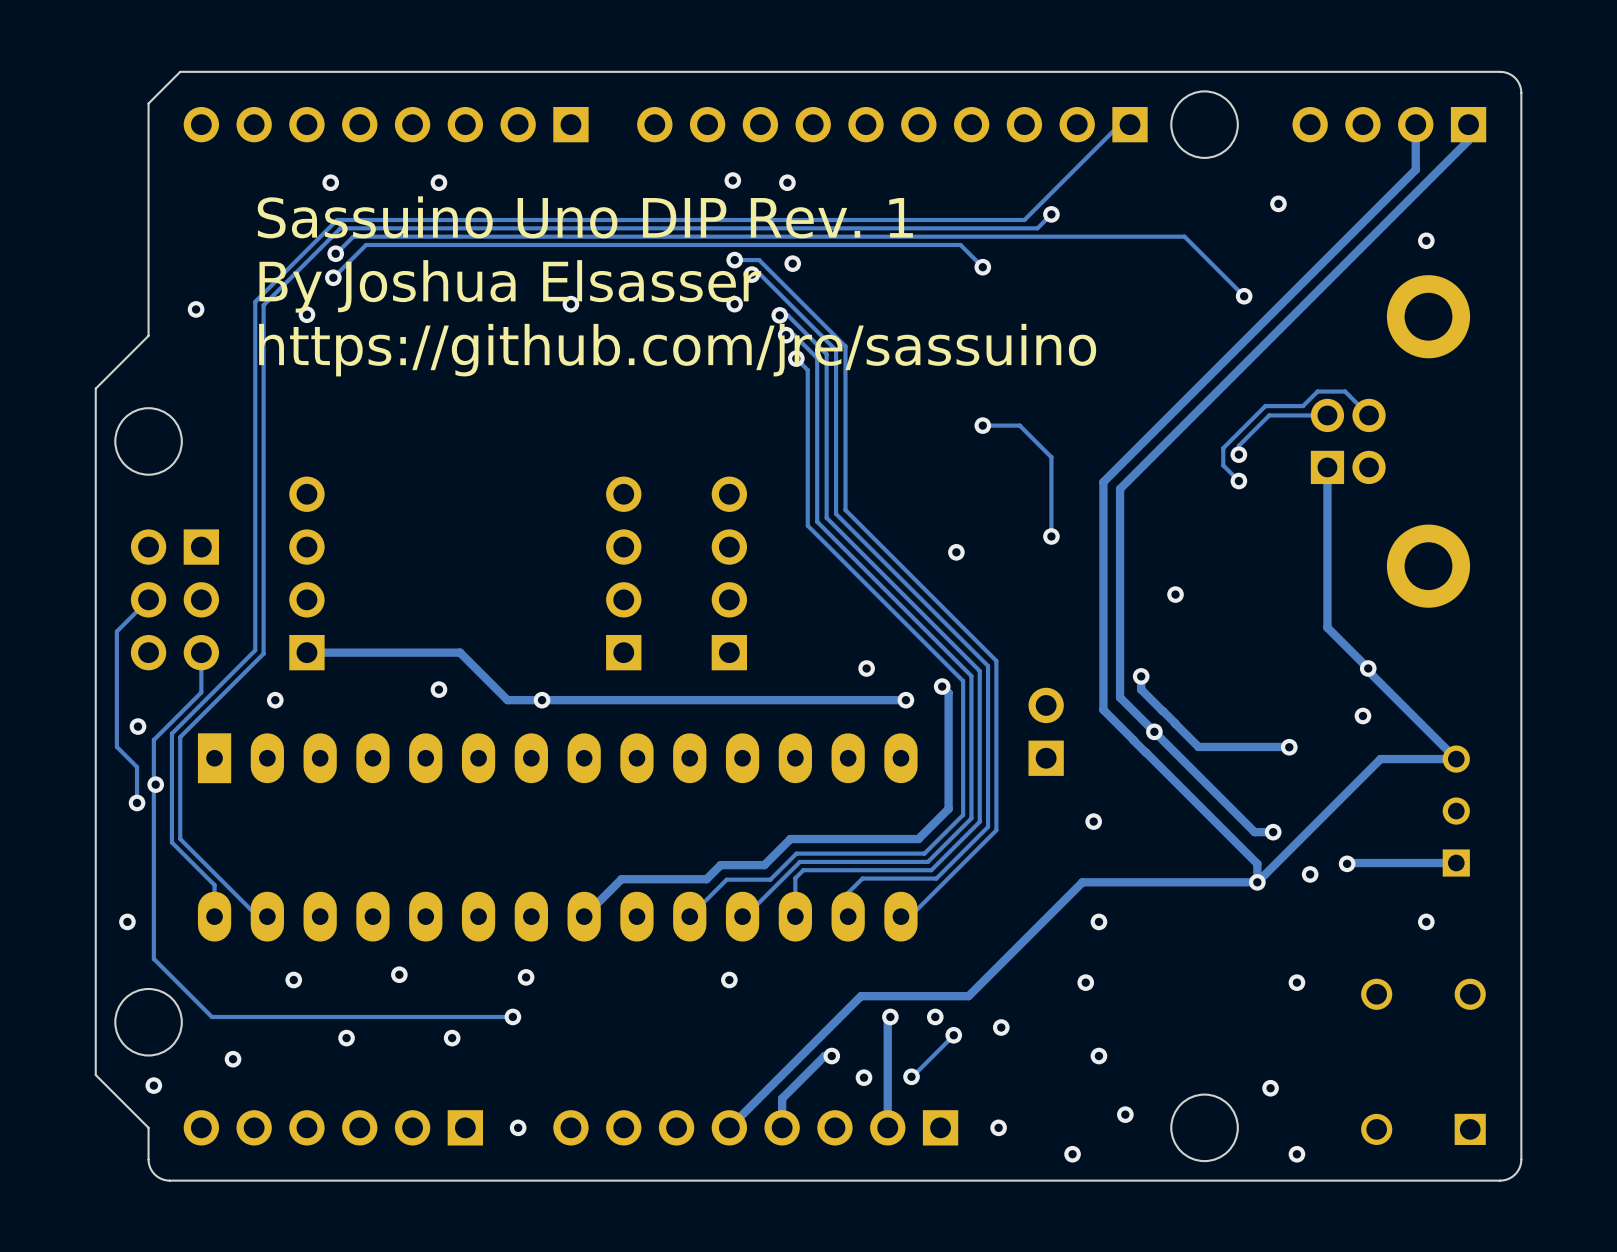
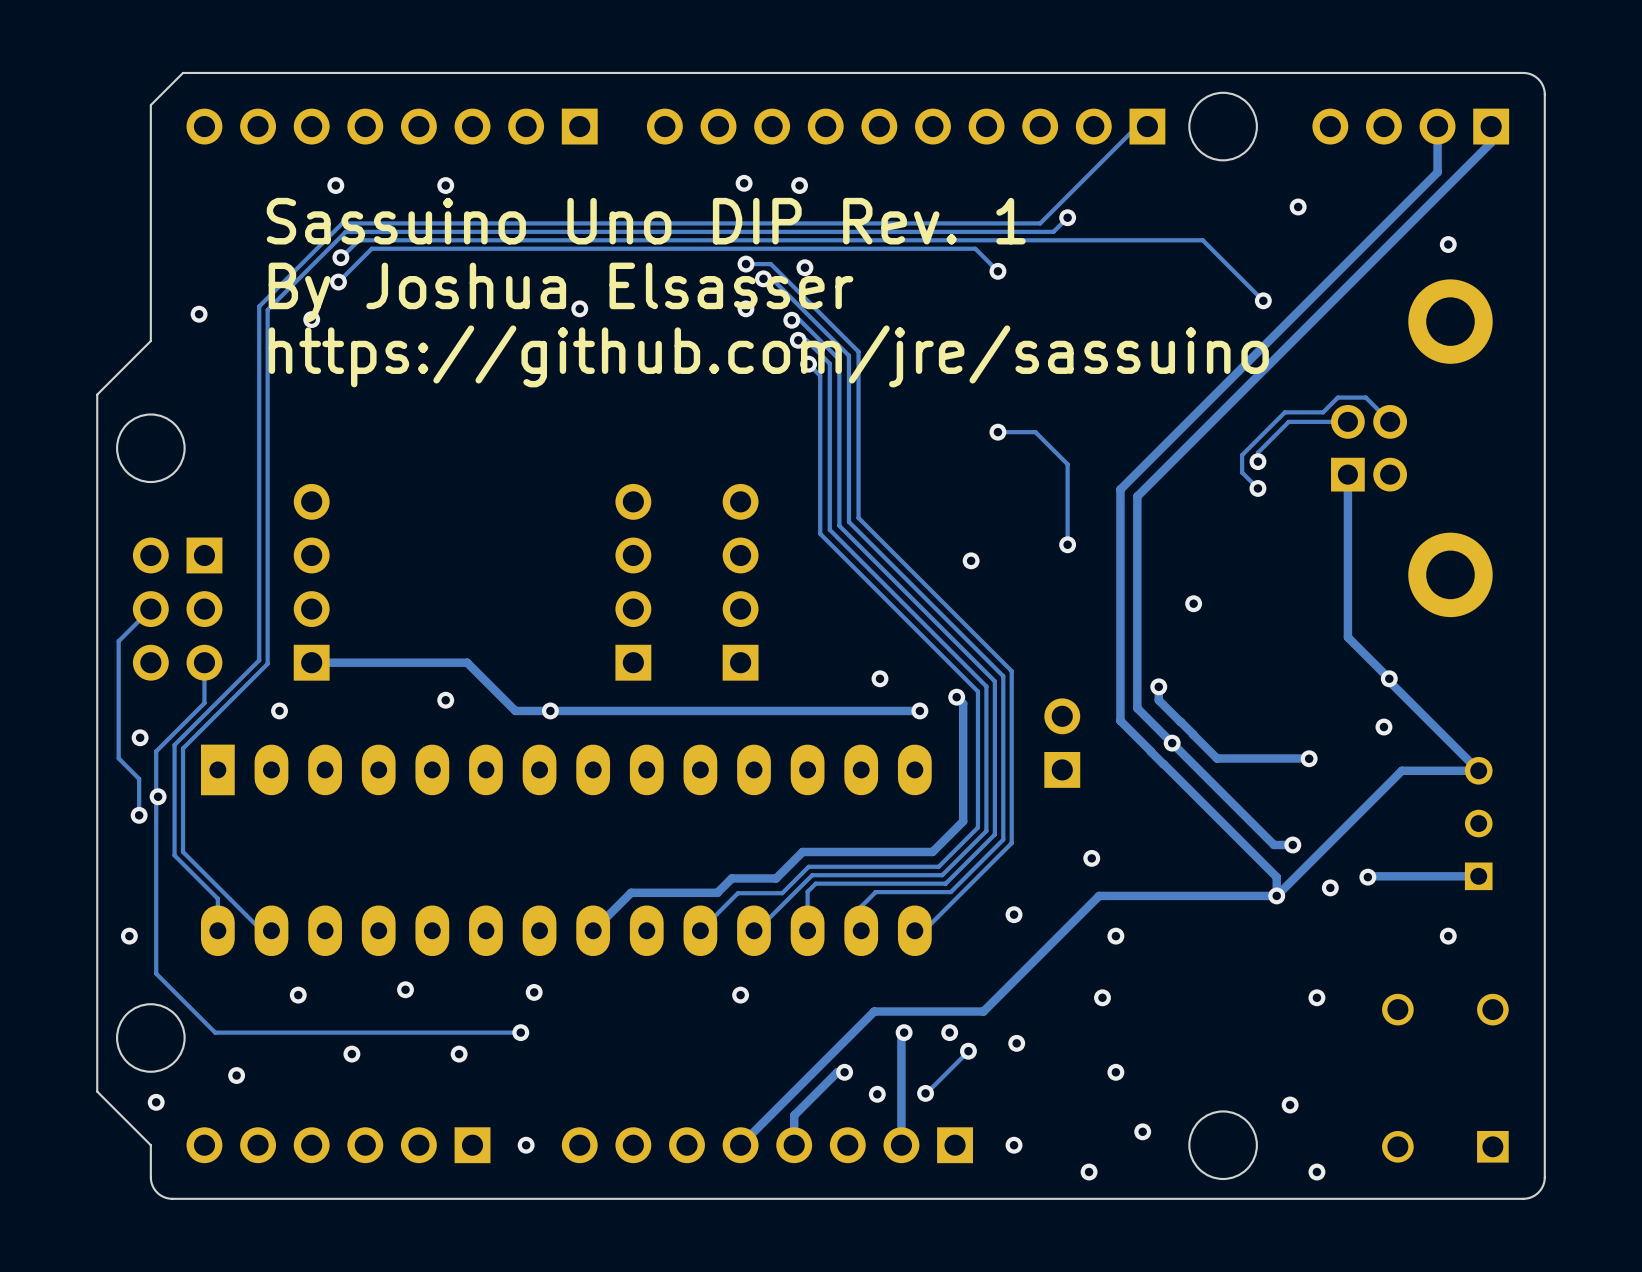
via position: (1093, 821) -> (1091, 858)
via: none -> (1014, 914)

